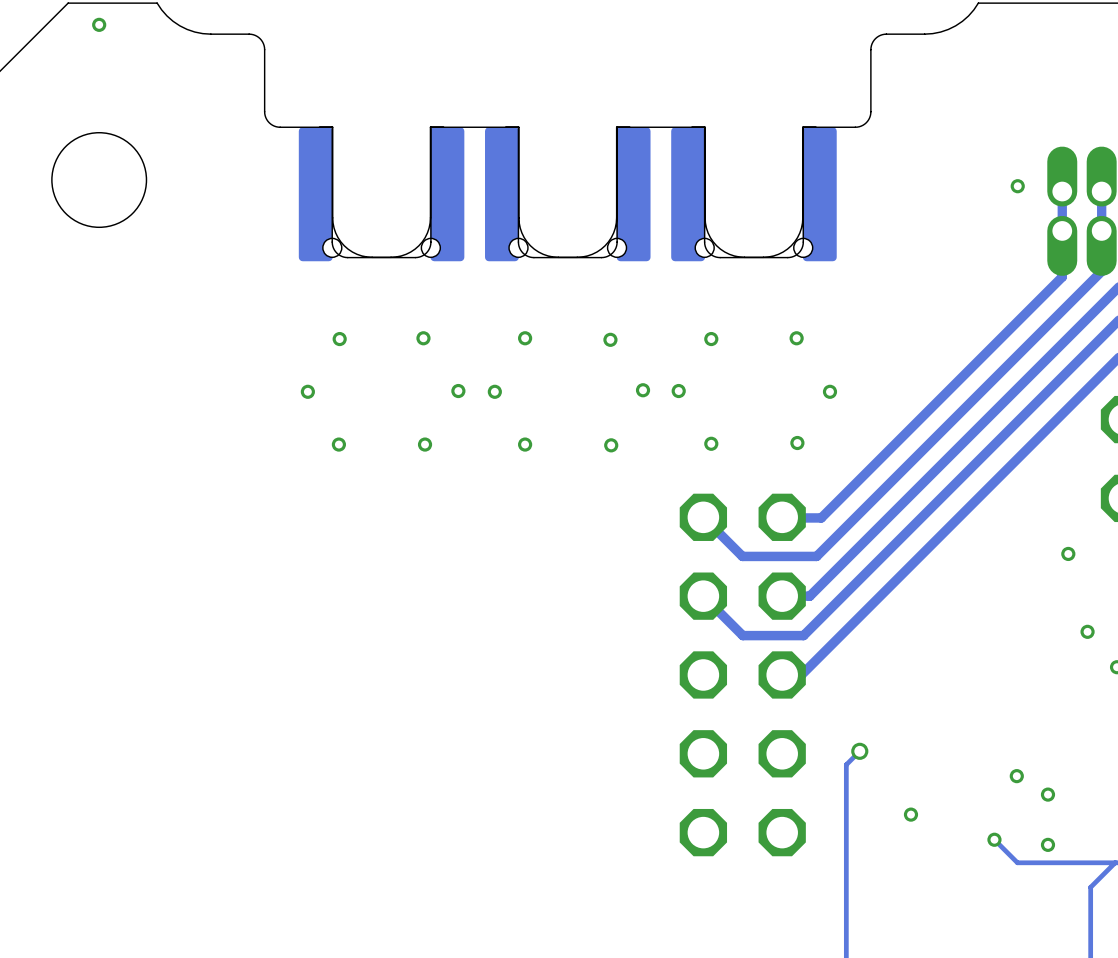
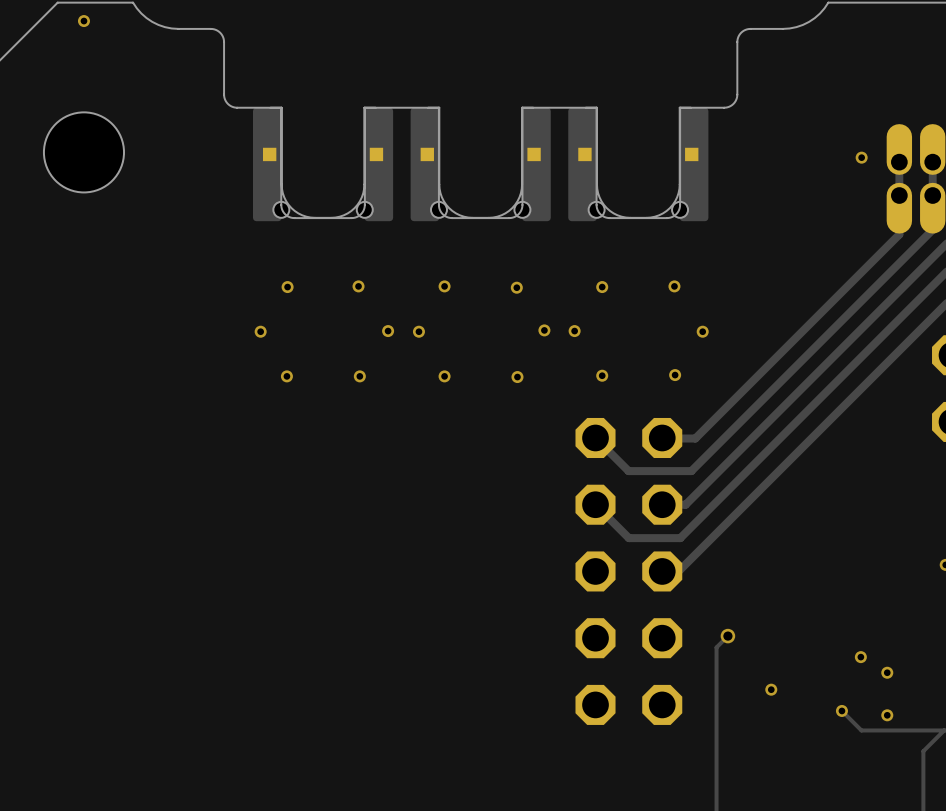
via: (1068, 553) -> none
via: (1087, 631) -> none

